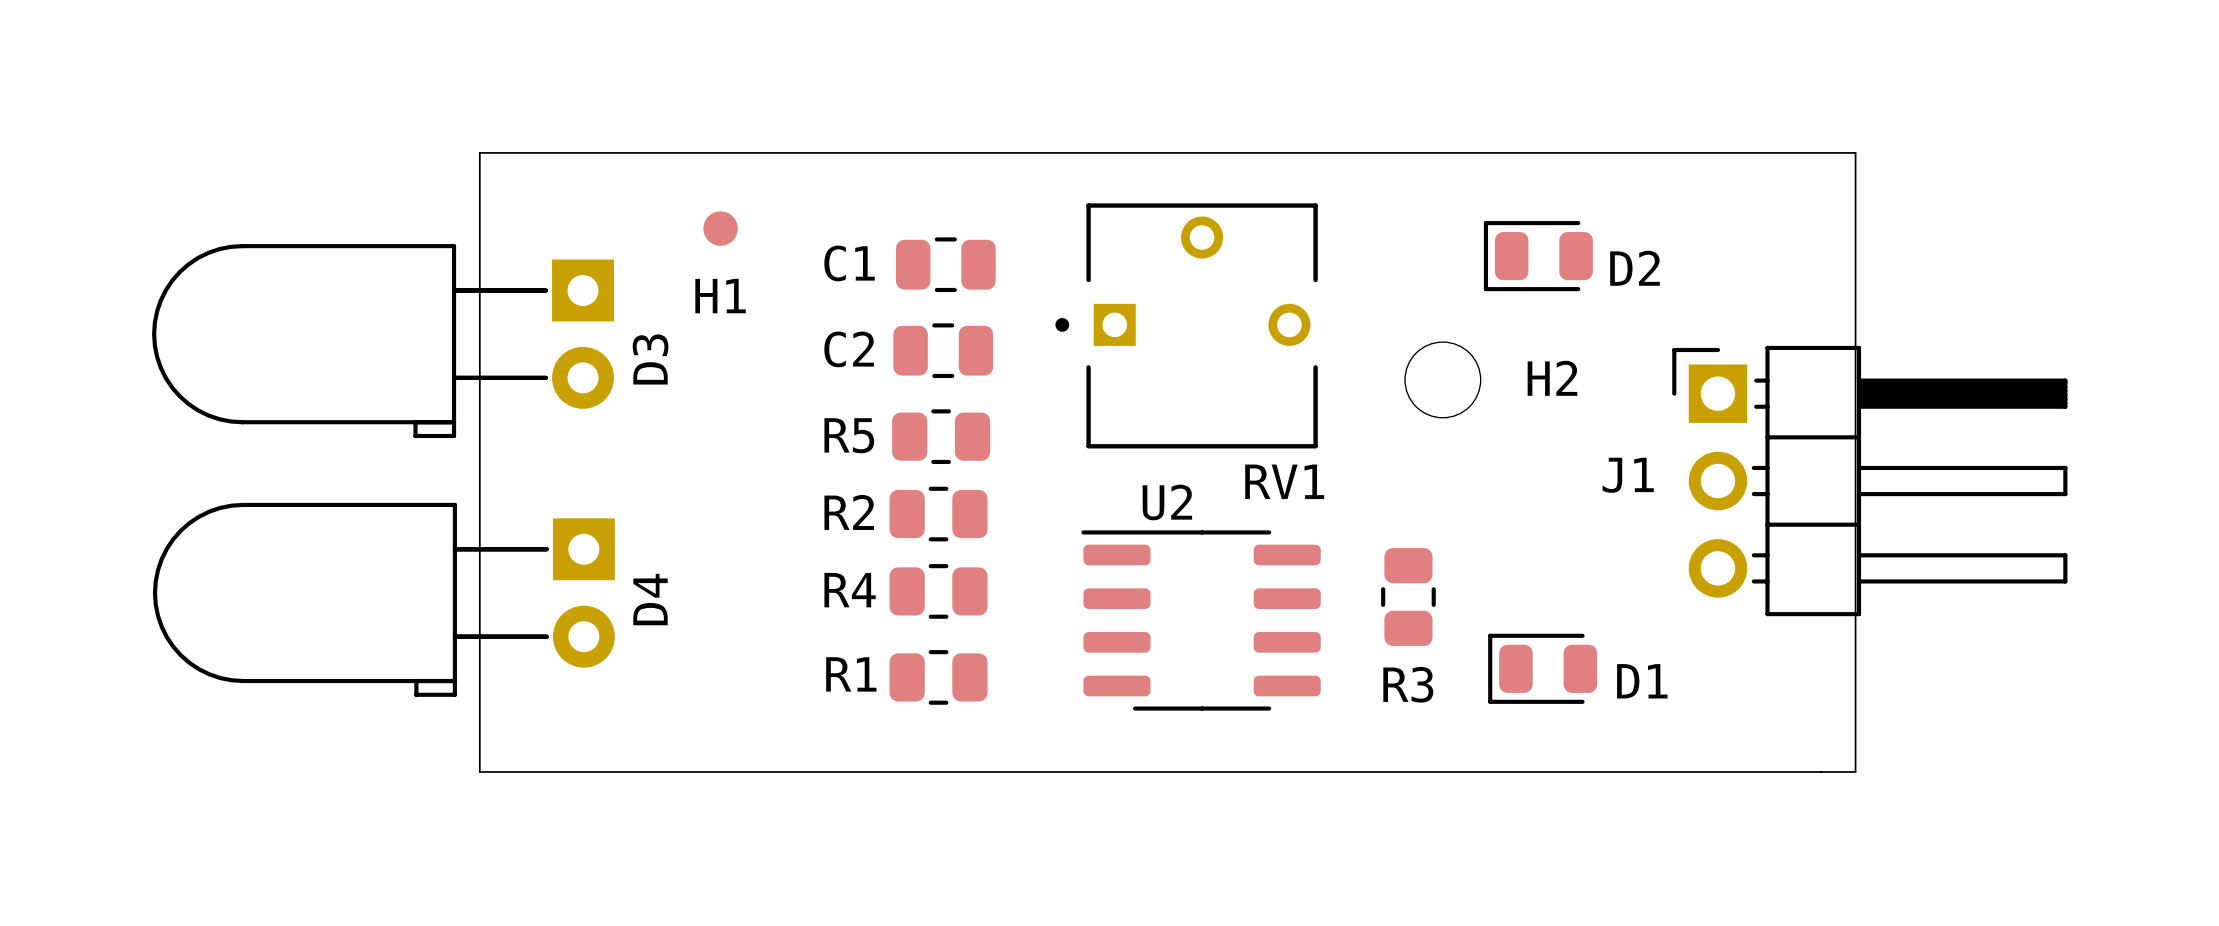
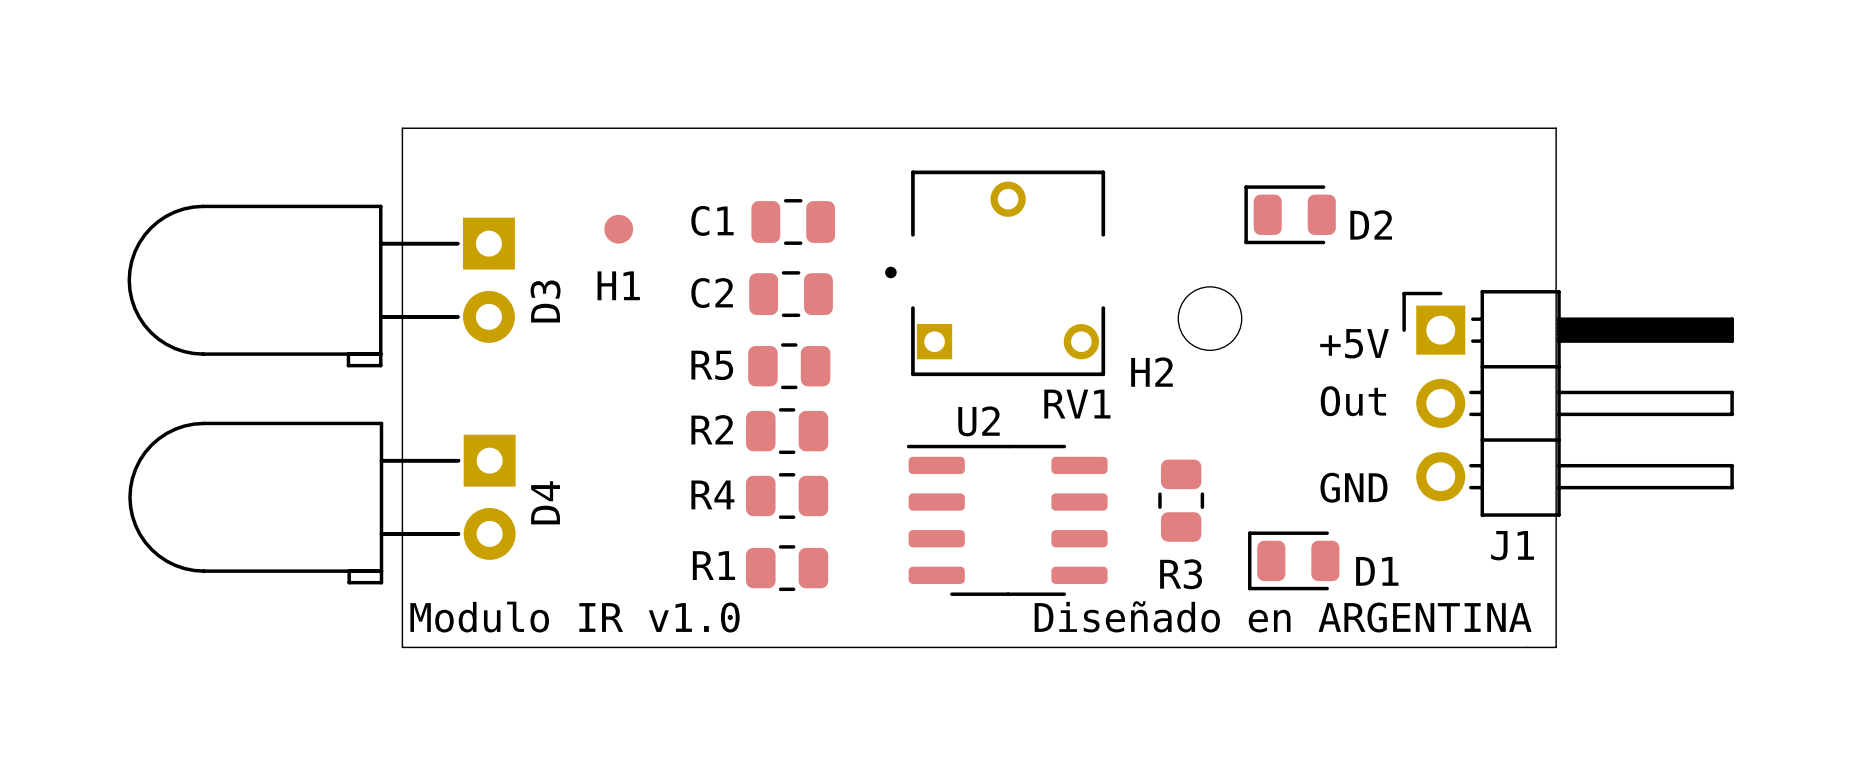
RV1 footprint: [1055, 203, 1318, 449] -> [885, 170, 1106, 377]
H1 position: (720, 228) -> (618, 229)
H2 name position: H2 (1552, 378) -> H2 (1151, 372)
text: none -> +5V (1354, 343)
J1 name position: J1 (1628, 475) -> J1 (1512, 545)
text: none -> Out (1353, 401)
text: none -> GND (1353, 487)
text: none -> Modulo IR v1.0 (575, 617)
text: none -> Diseñado en ARGENTINA (1283, 616)

